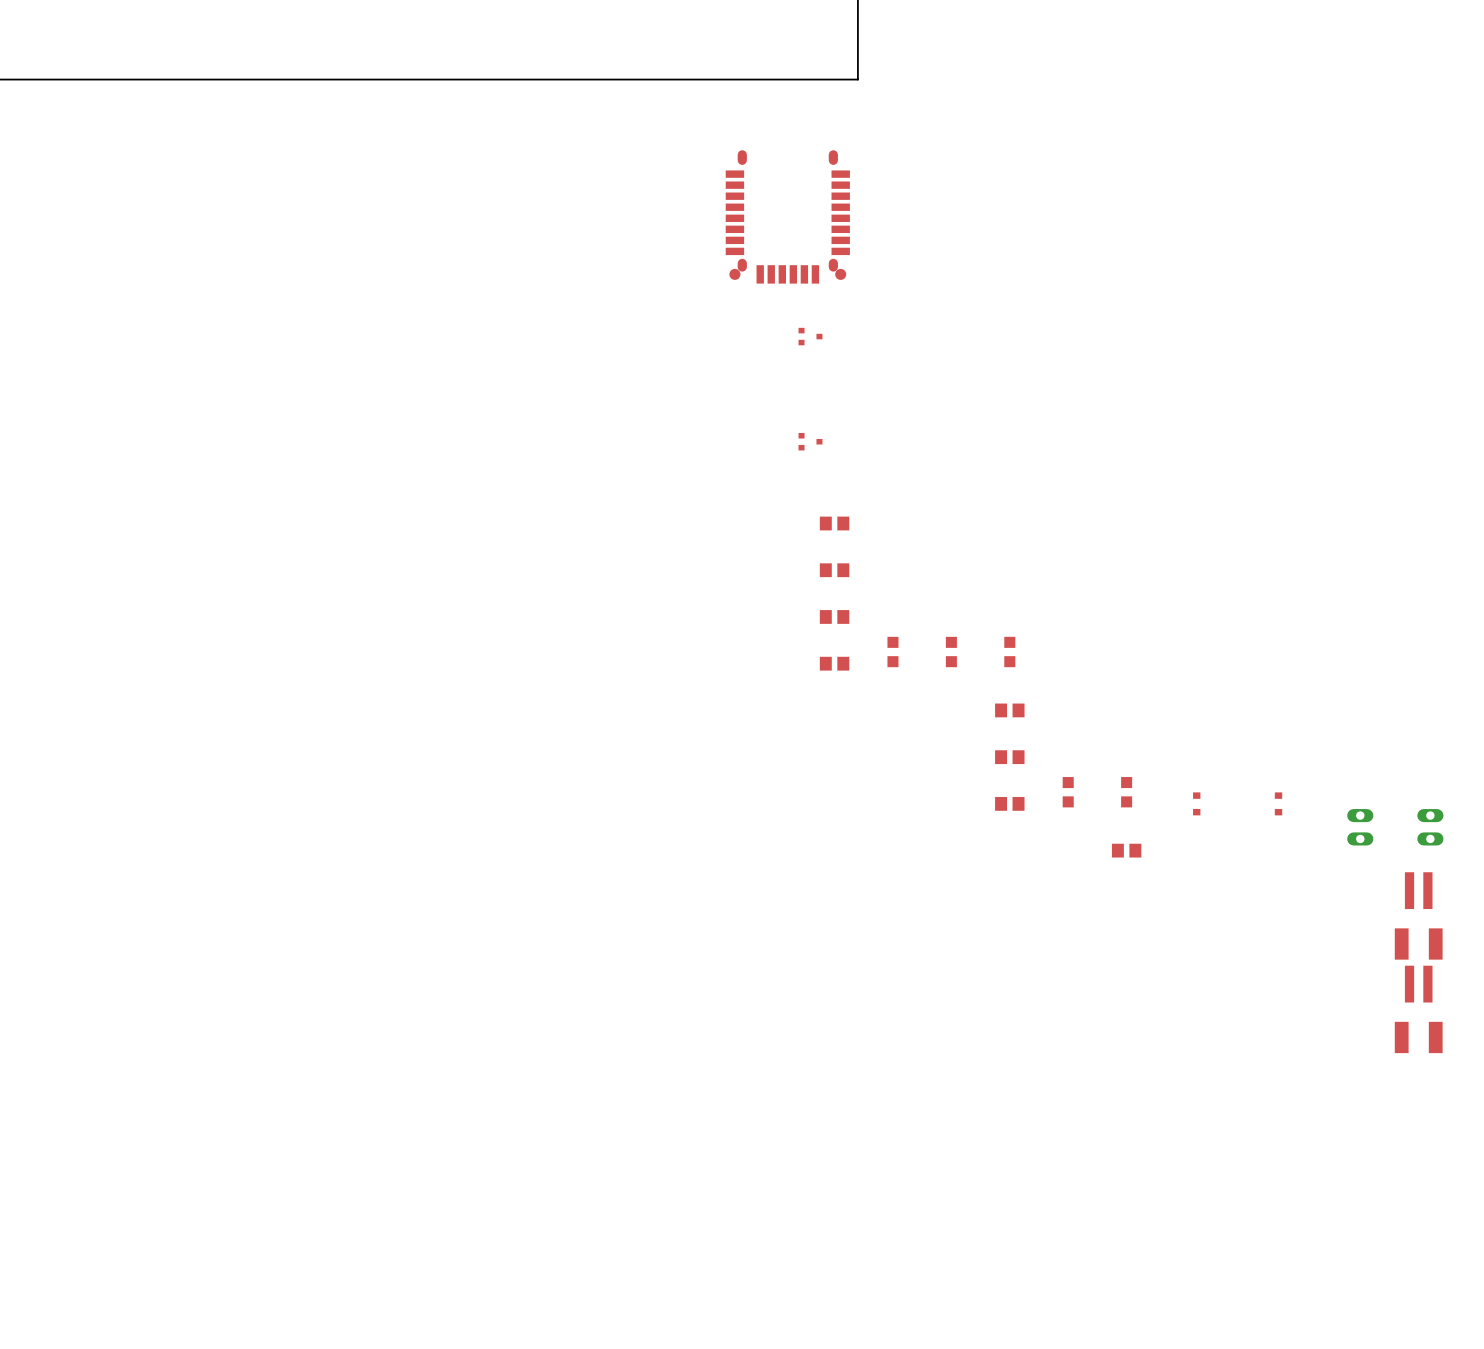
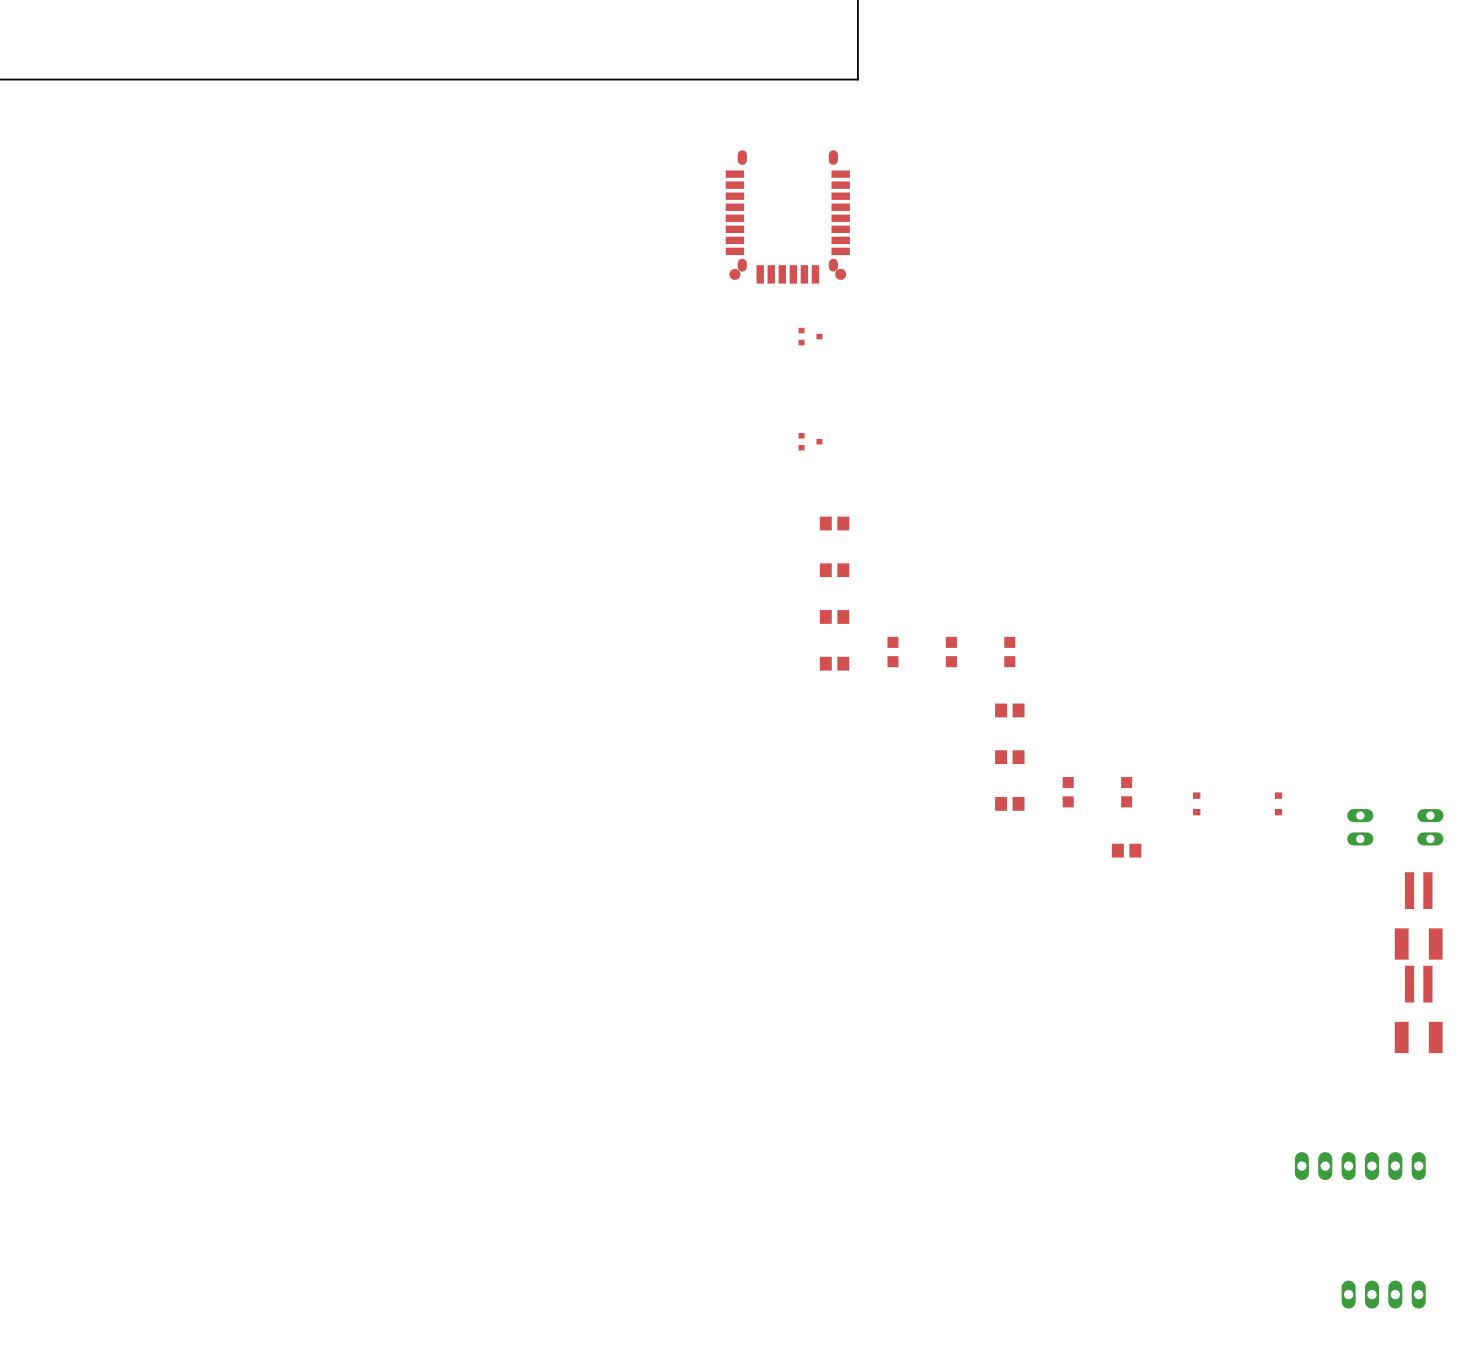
part: none -> (1360, 1166)
part: none -> (1383, 1294)

